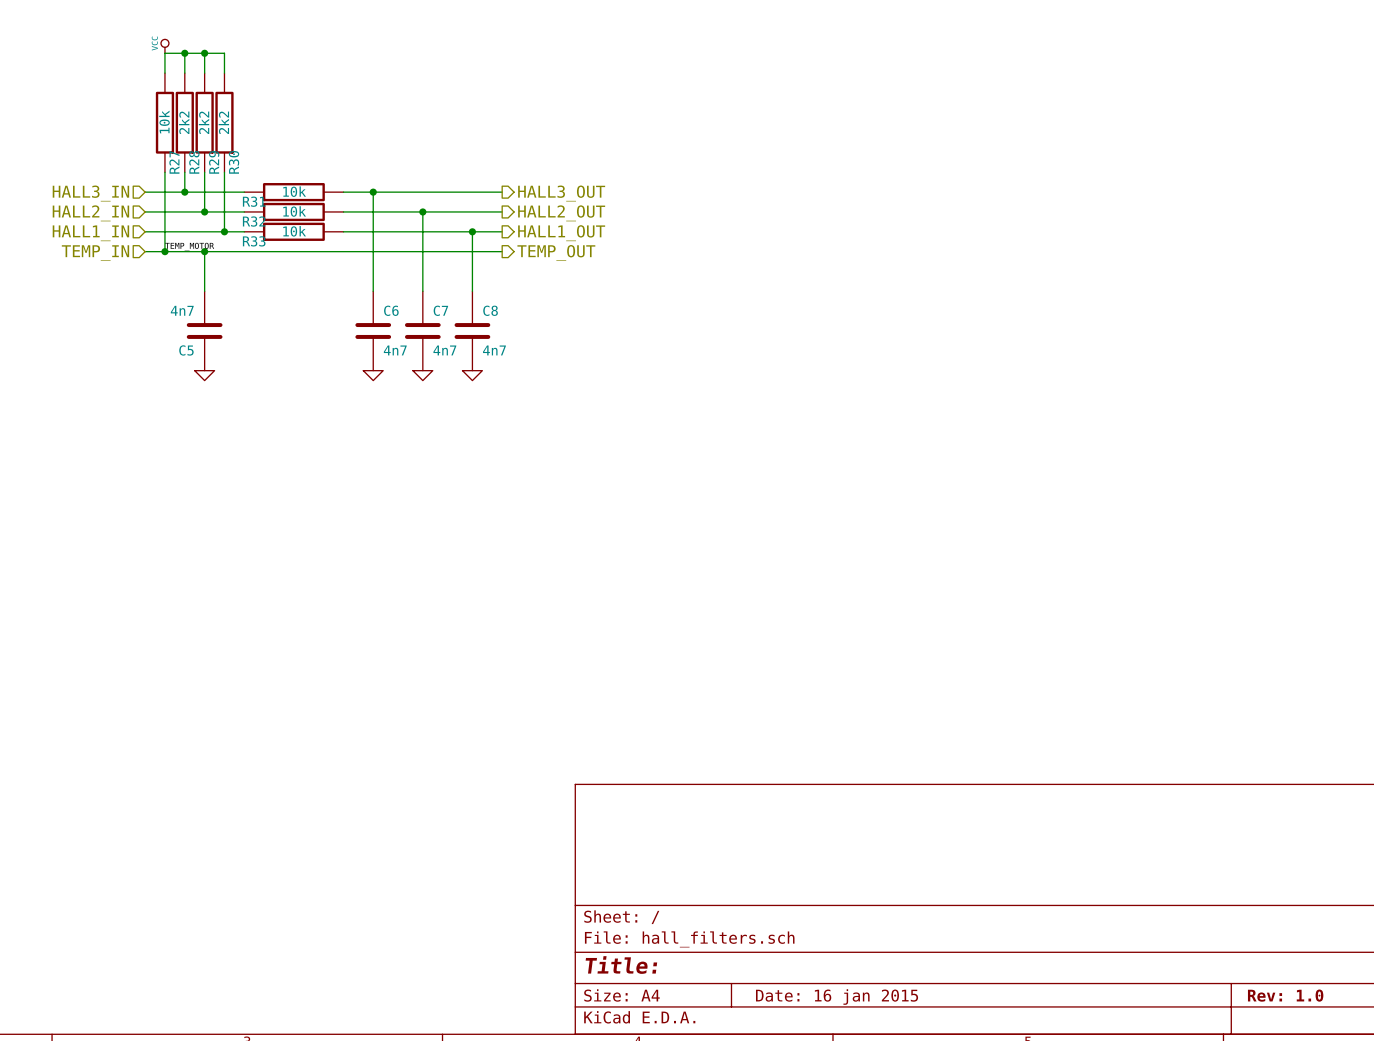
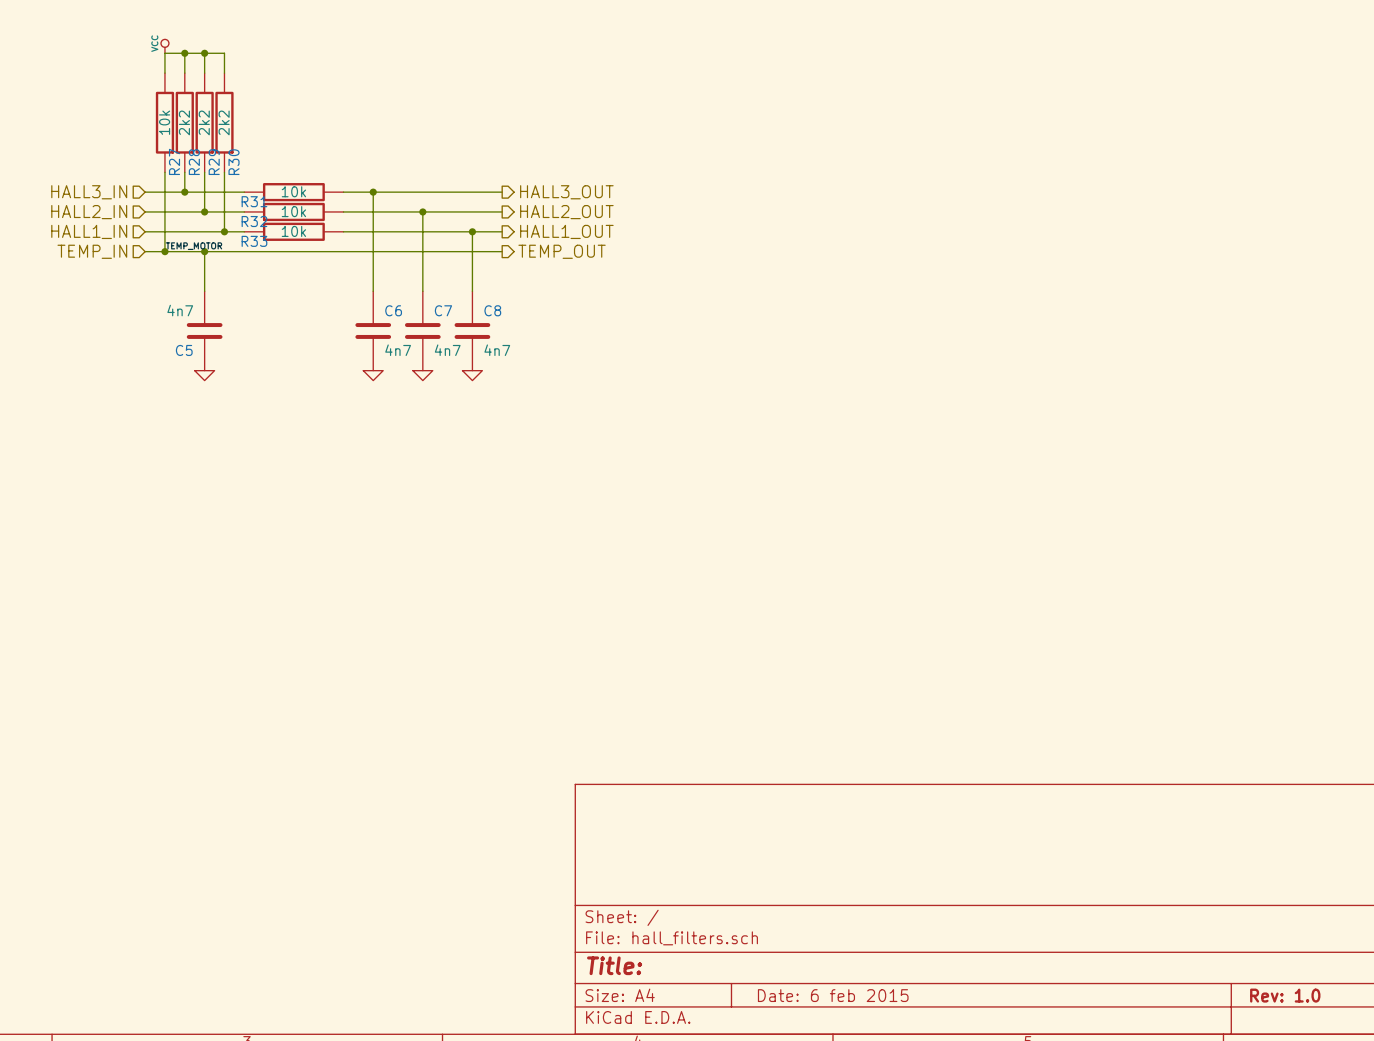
title block: Date: 16 jan 2015 (837, 997) -> Date: 6 feb 2015 (833, 995)

